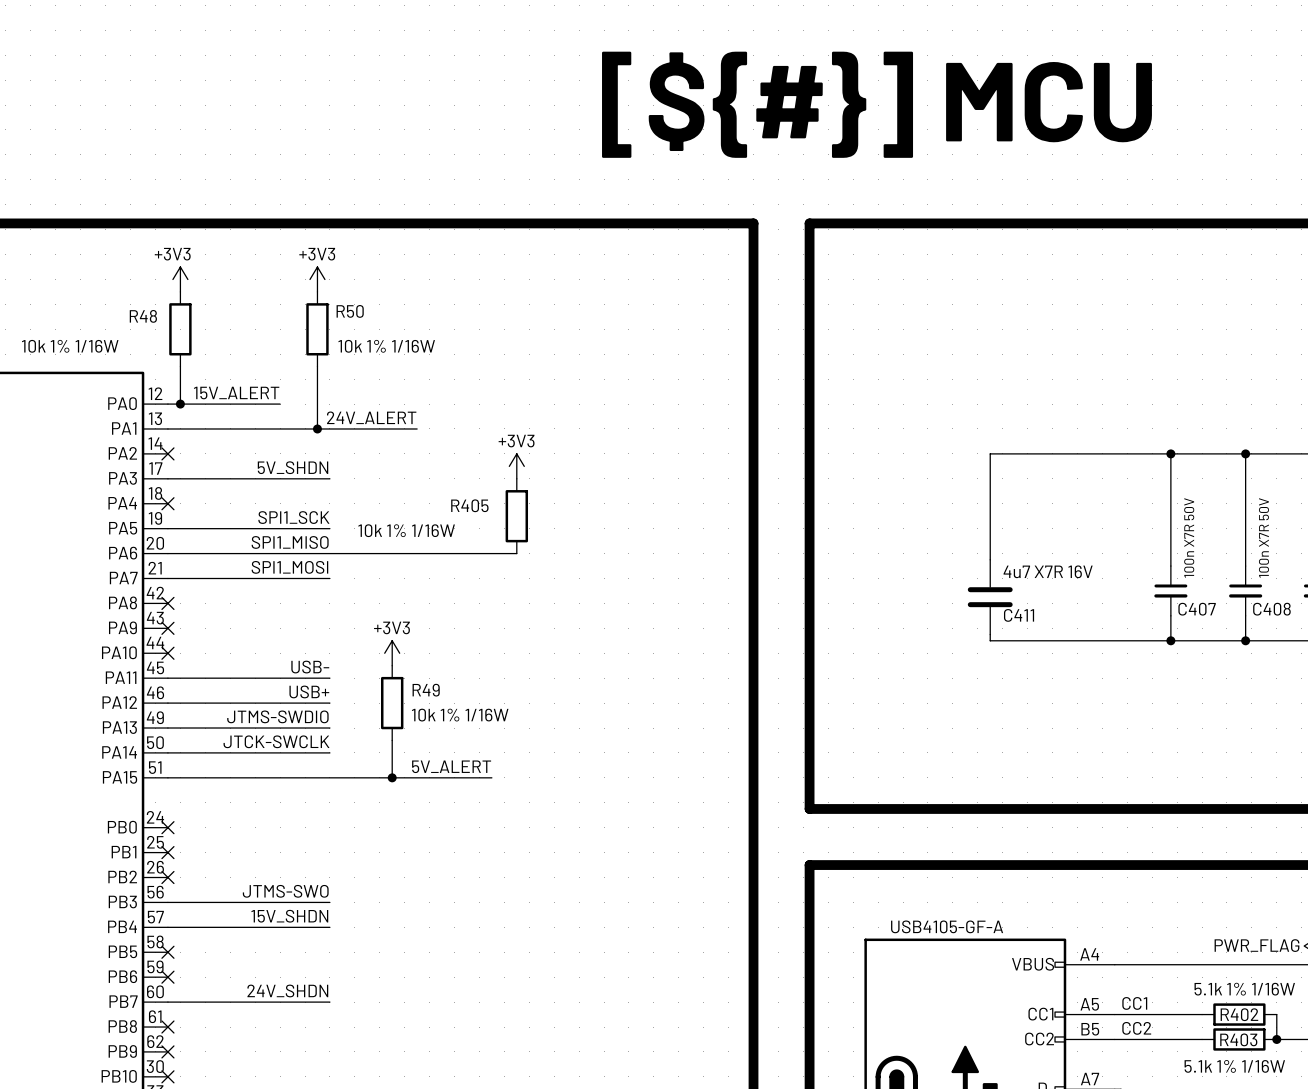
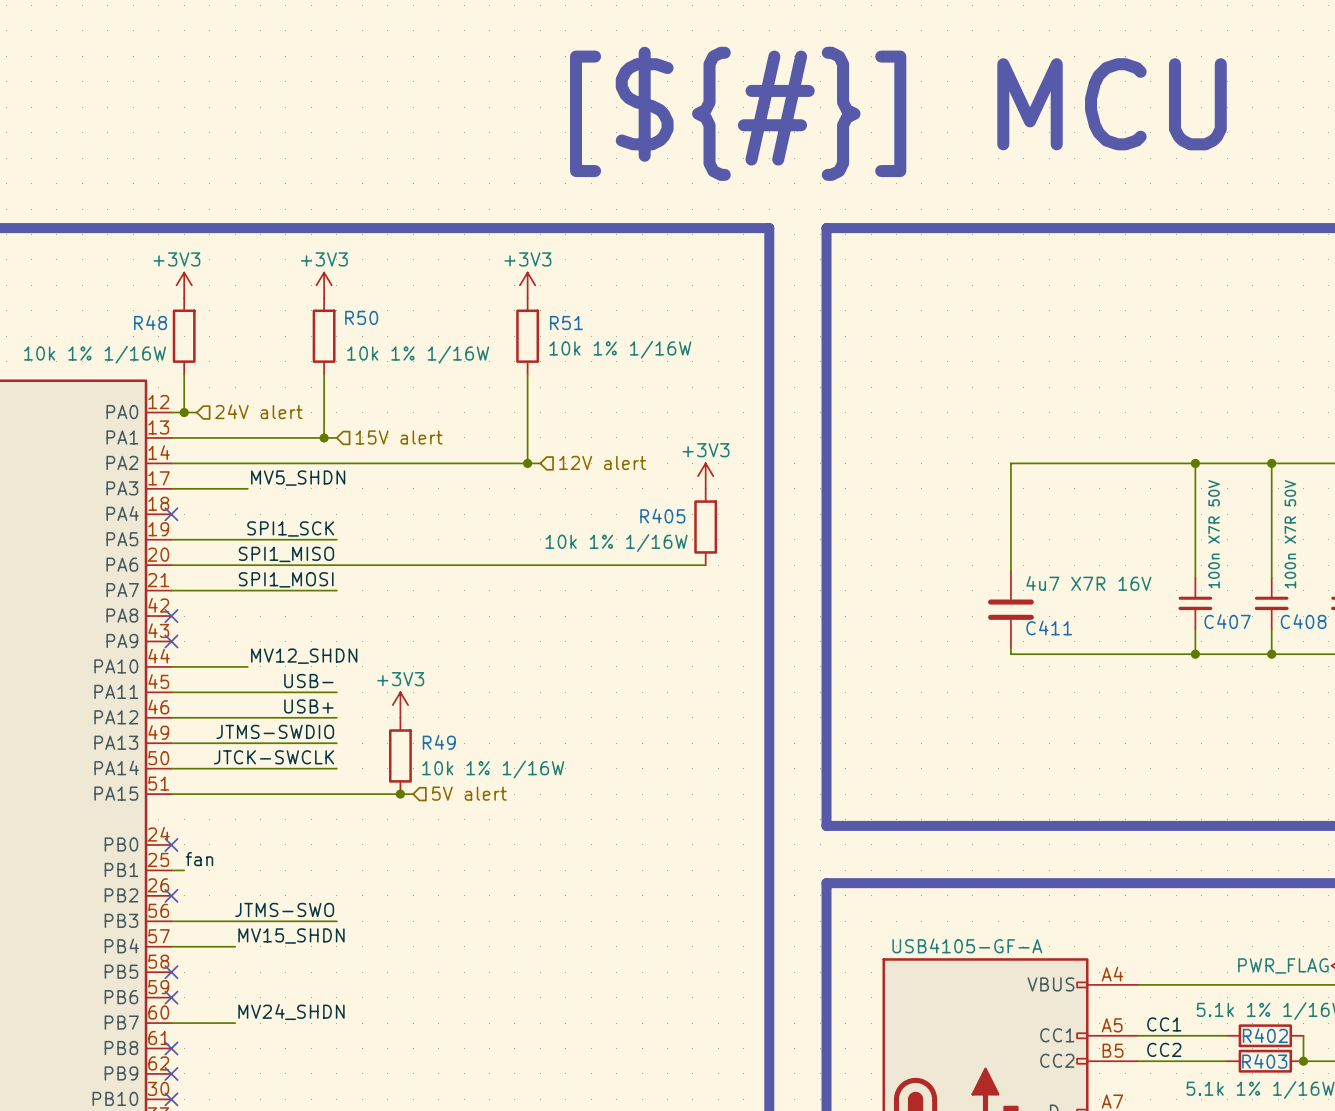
power symbol: none -> +3V3 (527, 285)
R51: none -> 10k 1% 1/16W (527, 336)
wire: none -> (527, 374) (527, 463)
label: 15V_ALERT (236, 393) -> none
hierarchical label: none -> 24V alert (258, 411)
wire: (192, 404) (280, 404) -> none
label: 24V_ALERT (371, 417) -> none
wire: (329, 428) (417, 428) -> none
hierarchical label: none -> 15V alert (399, 437)
wire: none -> (171, 463) (540, 463)
no-connect mark: (167, 453) -> none
junction: none -> (527, 463)
hierarchical label: none -> 12V alert (602, 462)
power symbol: +3V3 (516, 466) -> none
power symbol: none -> +3V3 (705, 476)
label: 5V_SHDN (293, 467) -> MV5_SHDN (298, 478)
wire: (242, 478) (329, 478) -> none
R405 position: (516, 516) -> (705, 527)
wire: none -> (527, 565) (705, 565)
label: none -> MV12_SHDN (304, 656)
wire: none -> (171, 666) (247, 666)
no-connect mark: (167, 653) -> none
power symbol position: +3V3 (392, 653) -> +3V3 (400, 705)
R49 position: (392, 703) -> (400, 755)
wire: (392, 740) (392, 777) -> none
label: 5V_ALERT (451, 766) -> none
wire: (404, 777) (491, 777) -> none
hierarchical label: none -> 5V alert (469, 793)
label: none -> fan (199, 859)
wire: none -> (171, 870) (184, 870)
no-connect mark: (167, 852) -> none
label: 15V_SHDN (289, 916) -> MV15_SHDN (291, 936)
wire: (230, 927) (329, 927) -> none
label: 24V_SHDN (287, 990) -> MV24_SHDN (291, 1012)
wire: (230, 1002) (329, 1002) -> none

